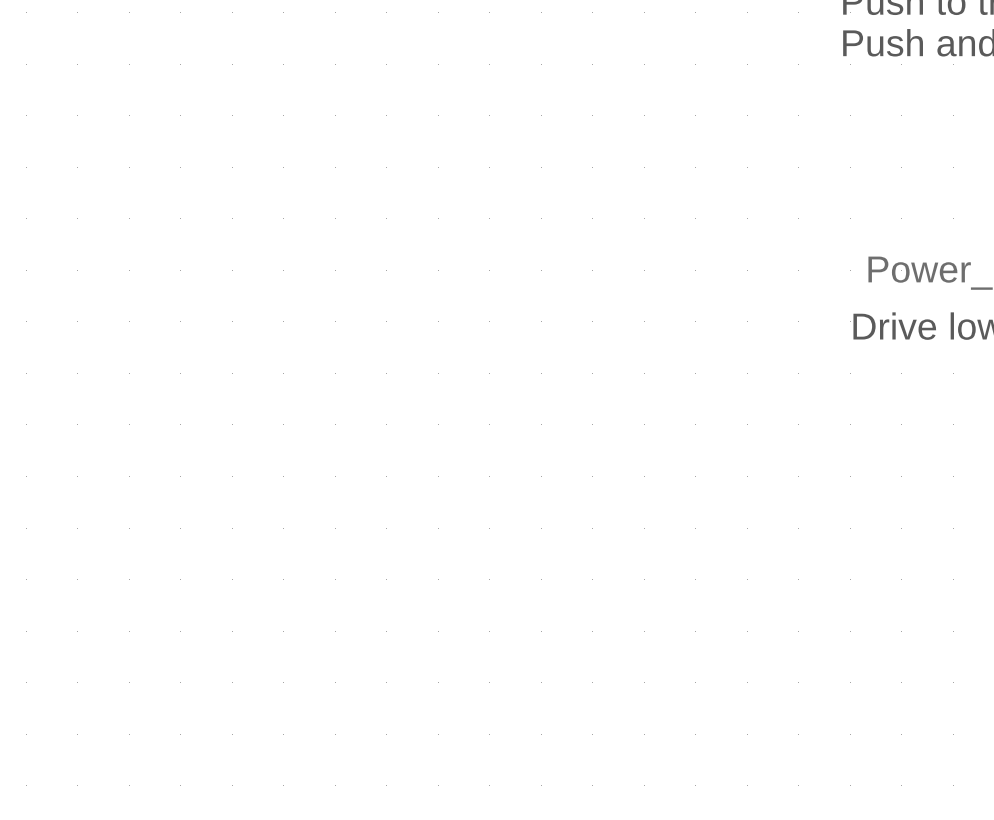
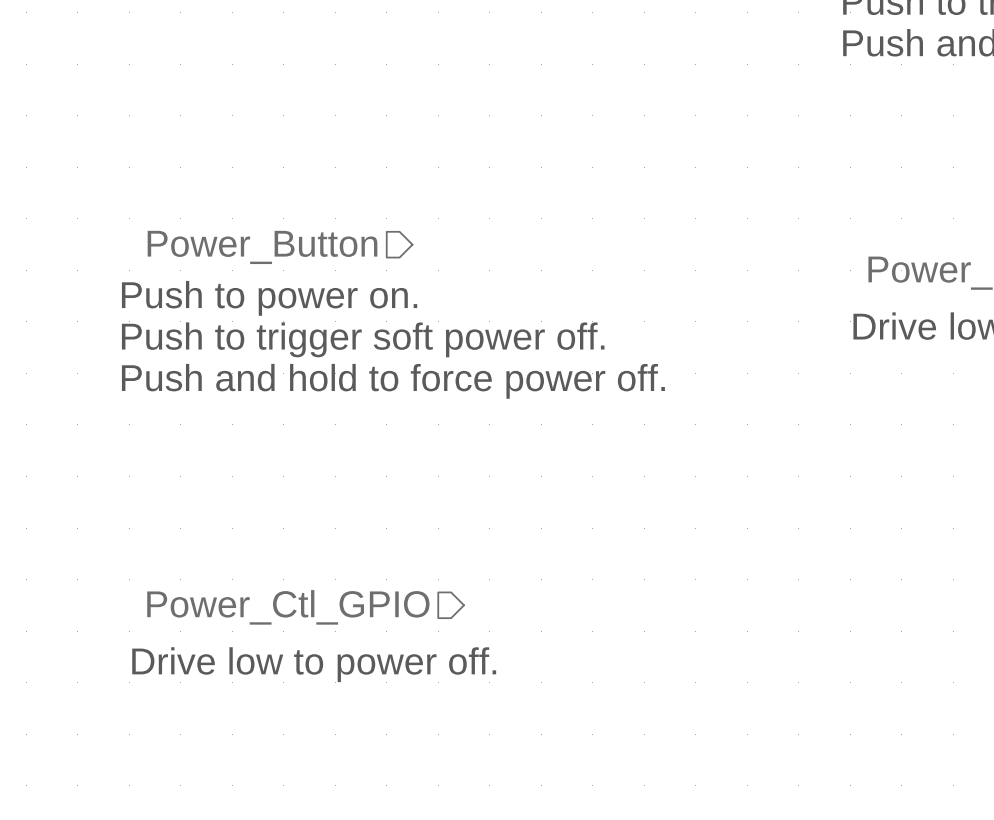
hierarchical label: none -> Power_Button (262, 247)
text: none -> Push to power on. (269, 298)
text: none -> Push to trigger soft power off. (363, 339)
text: none -> Push and hold to force power off. (393, 381)
hierarchical label: none -> Power_Ctl_GPIO (288, 607)
text: none -> Drive low to power off. (314, 664)

